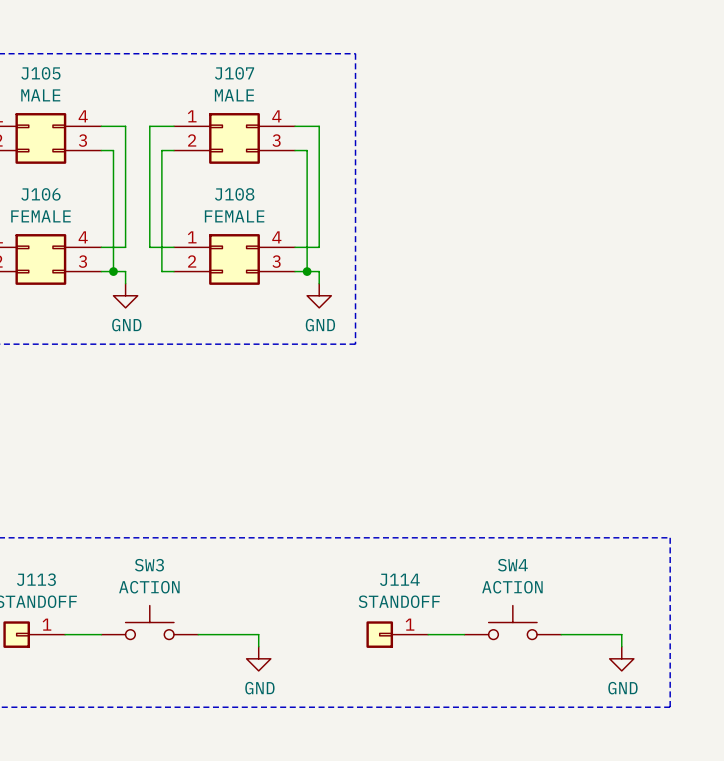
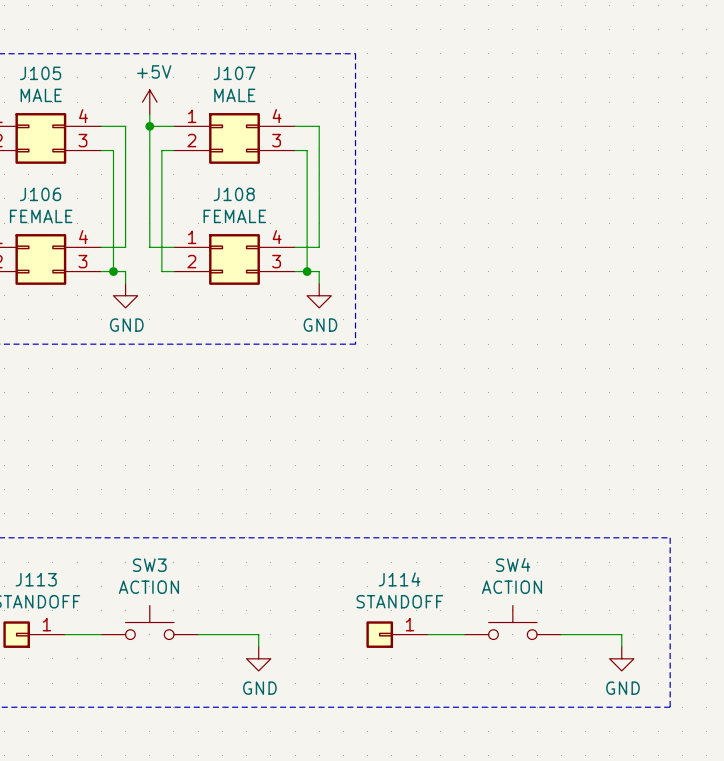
power symbol: none -> +5V (149, 102)
wire: none -> (149, 114) (149, 126)
junction: none -> (149, 126)

